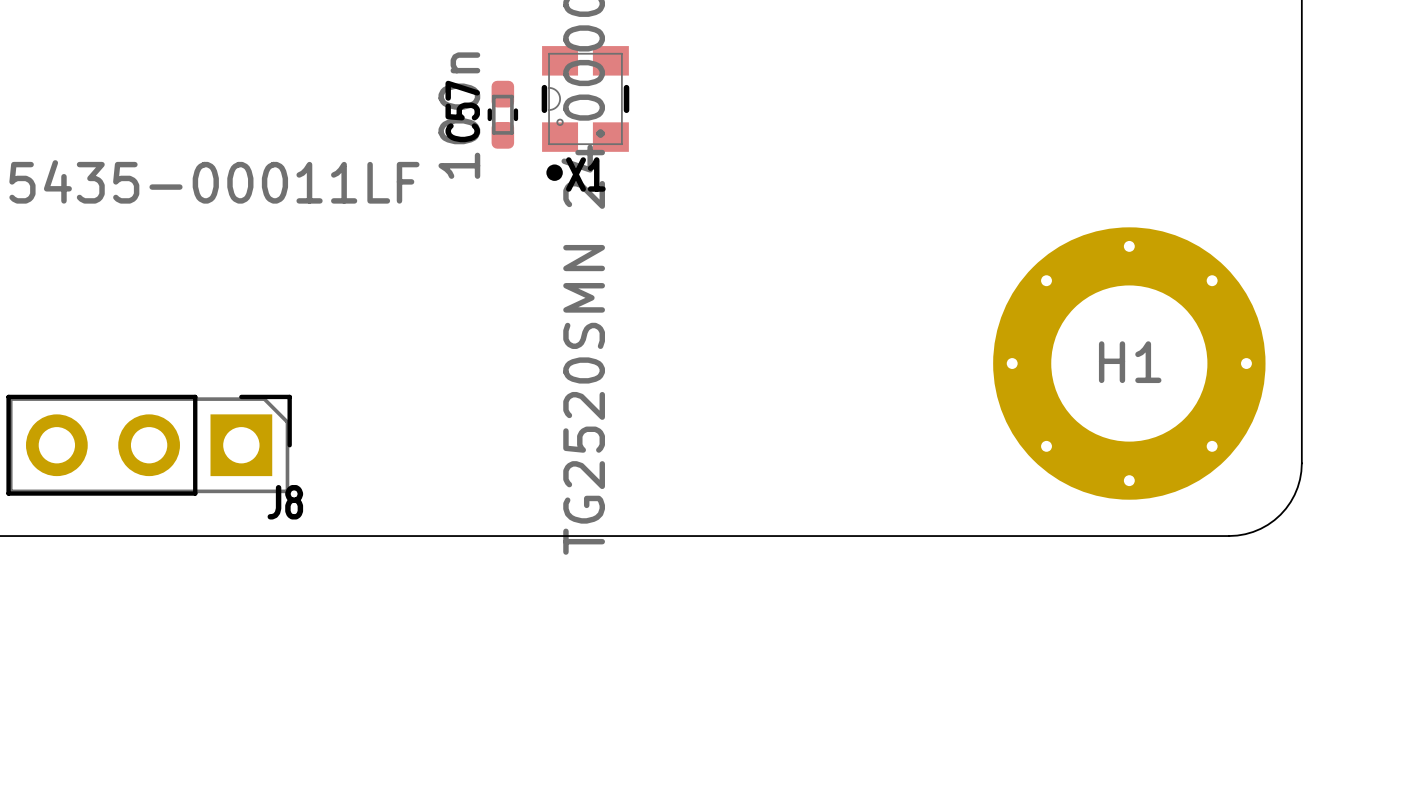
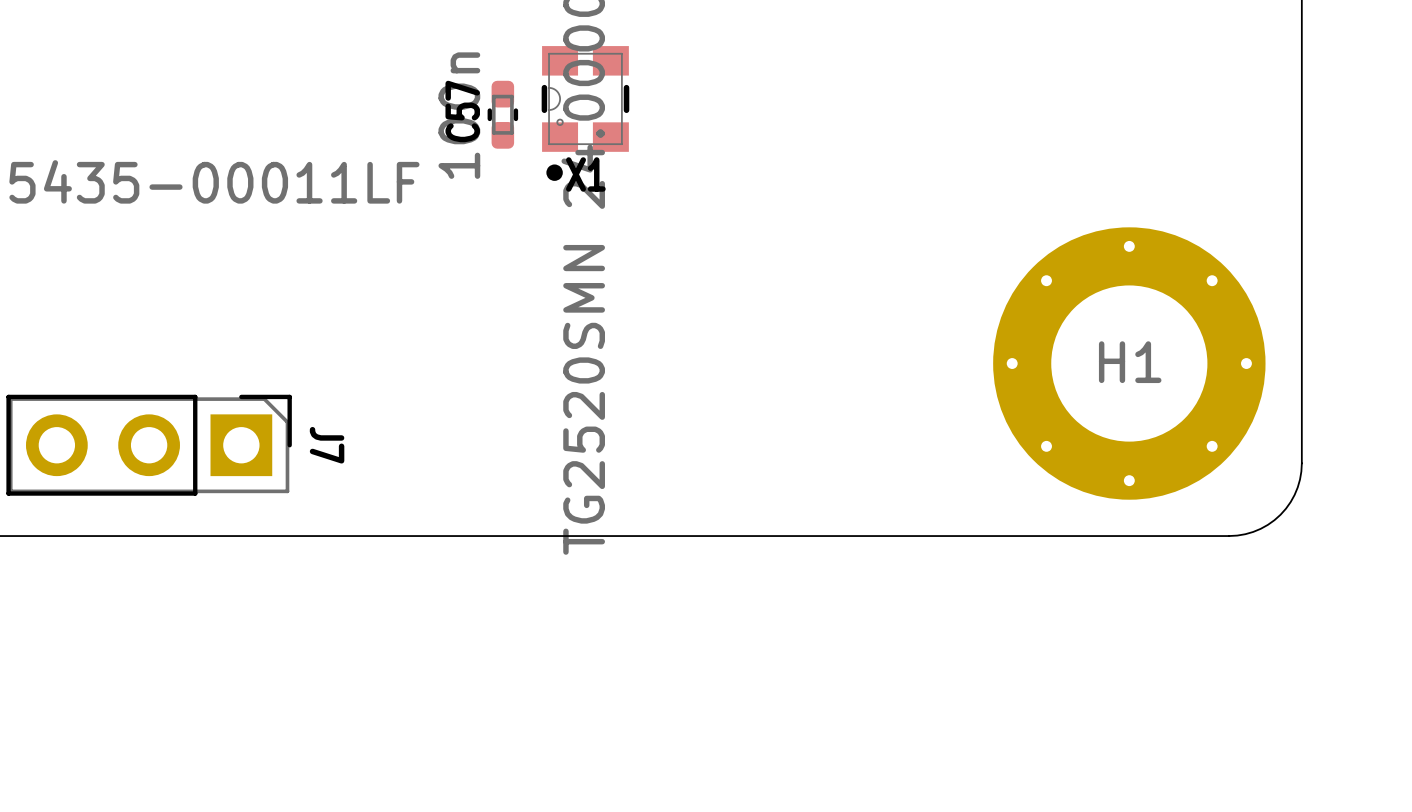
J8 name: J8 (285, 502) -> J7 (327, 445)

